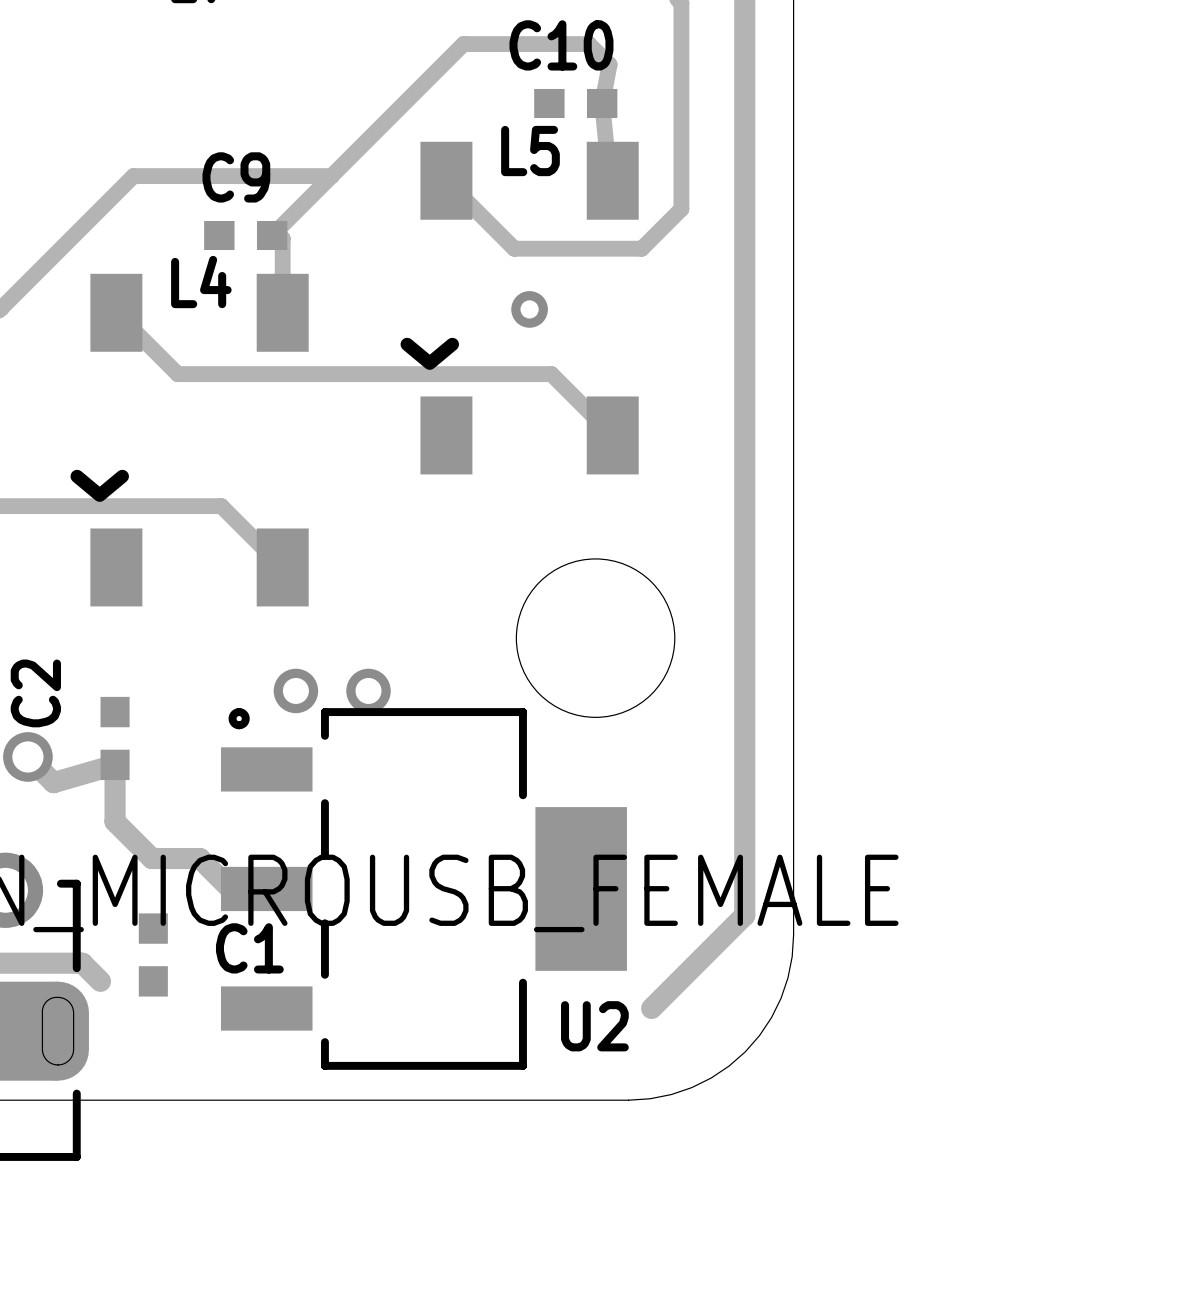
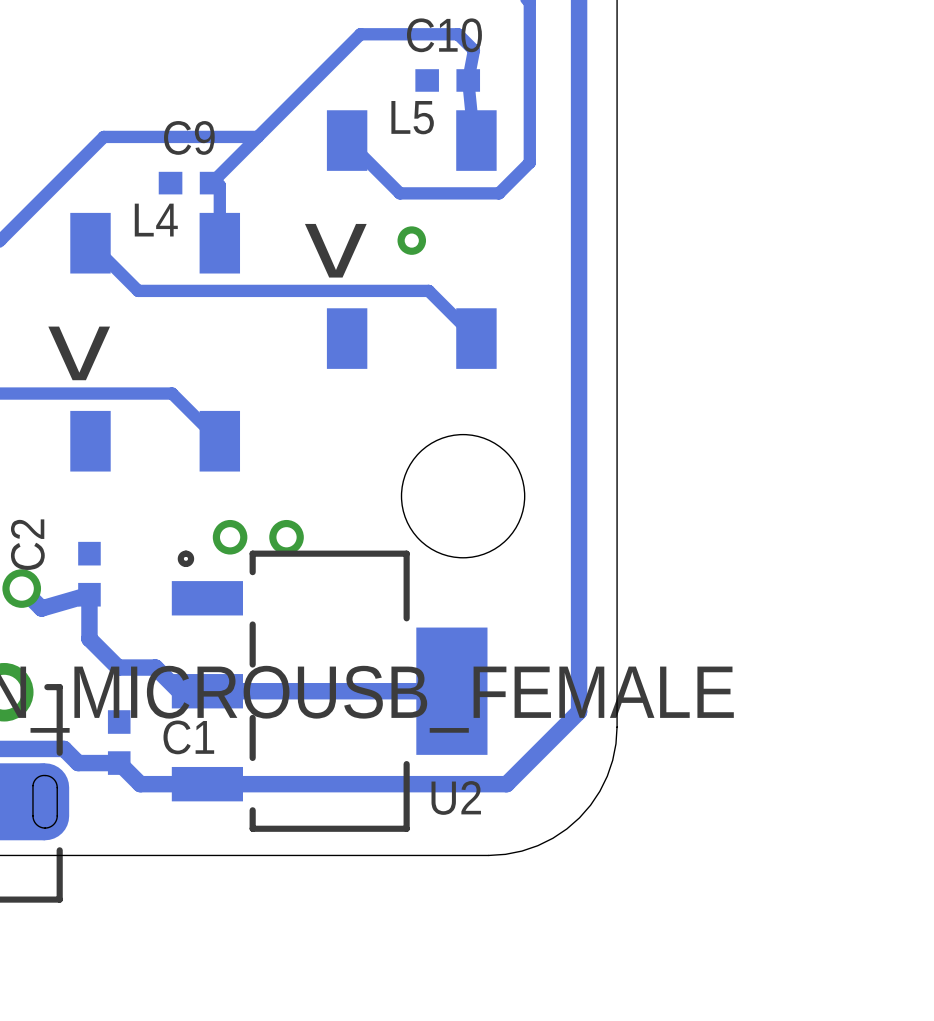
track: none -> (451, 691) (179, 691)
track: none -> (78, 763) (119, 763) (140, 784) (506, 784)

